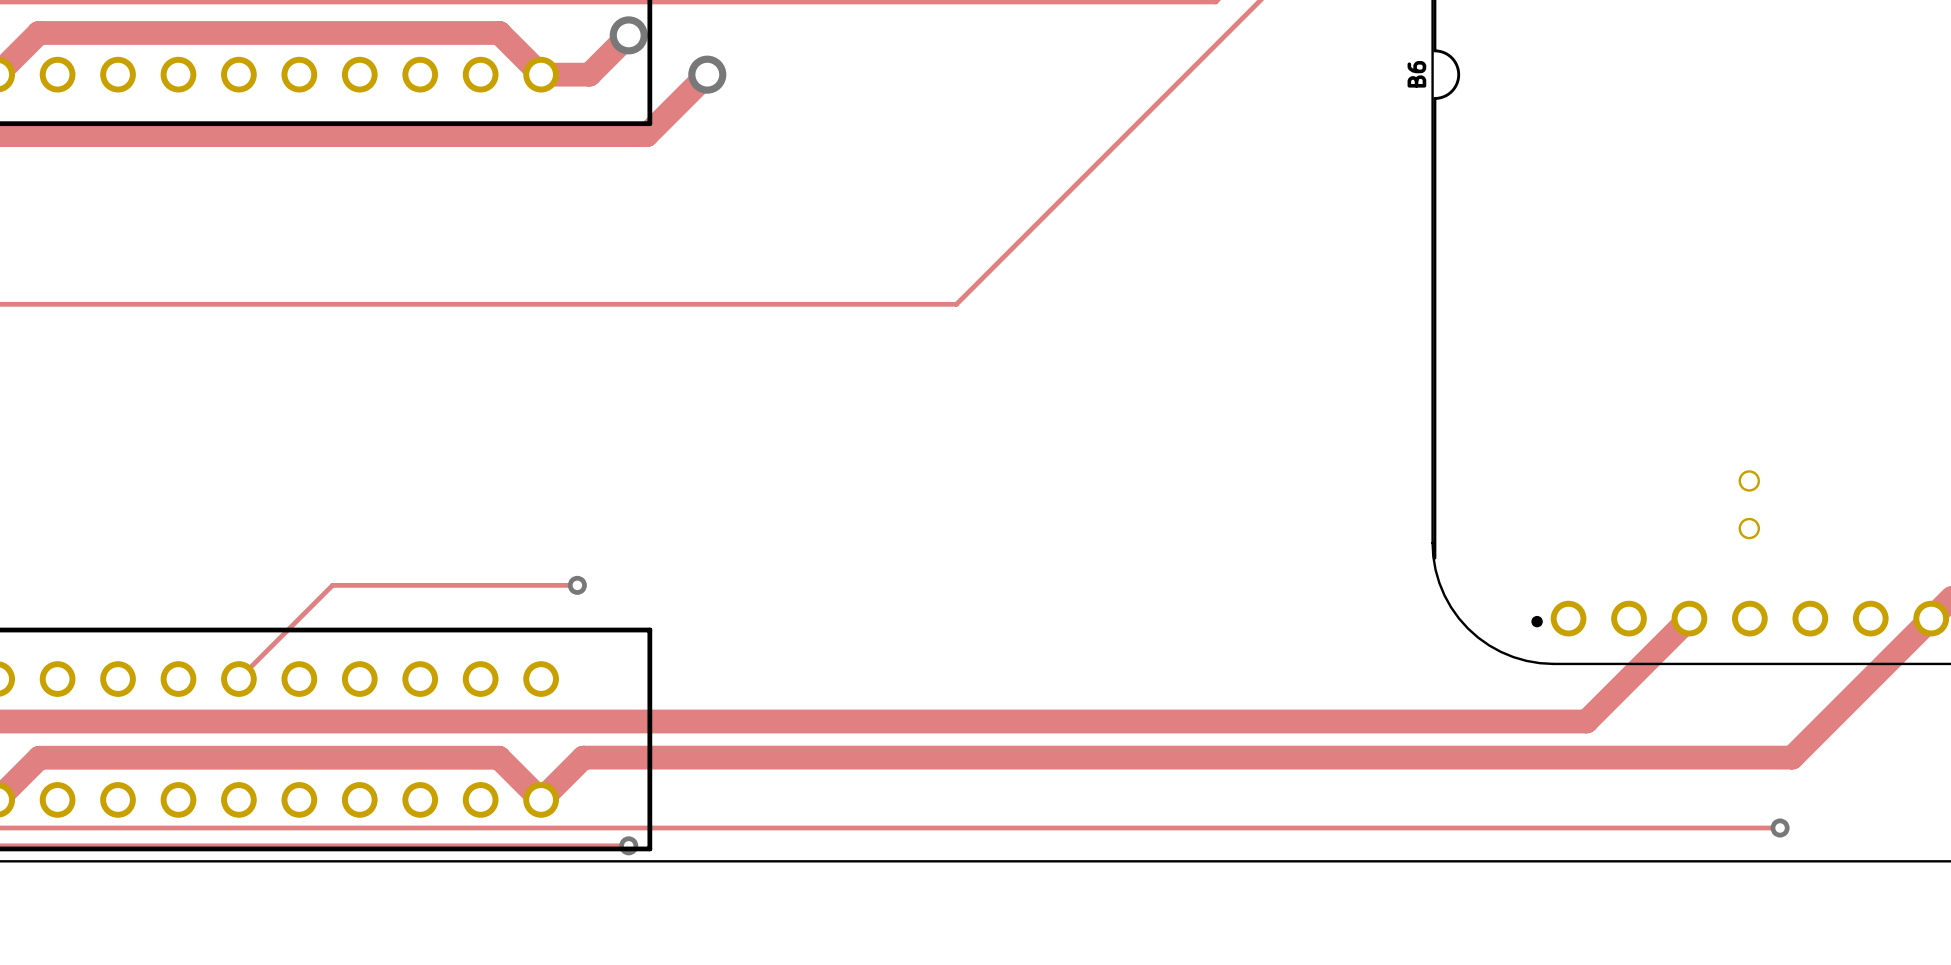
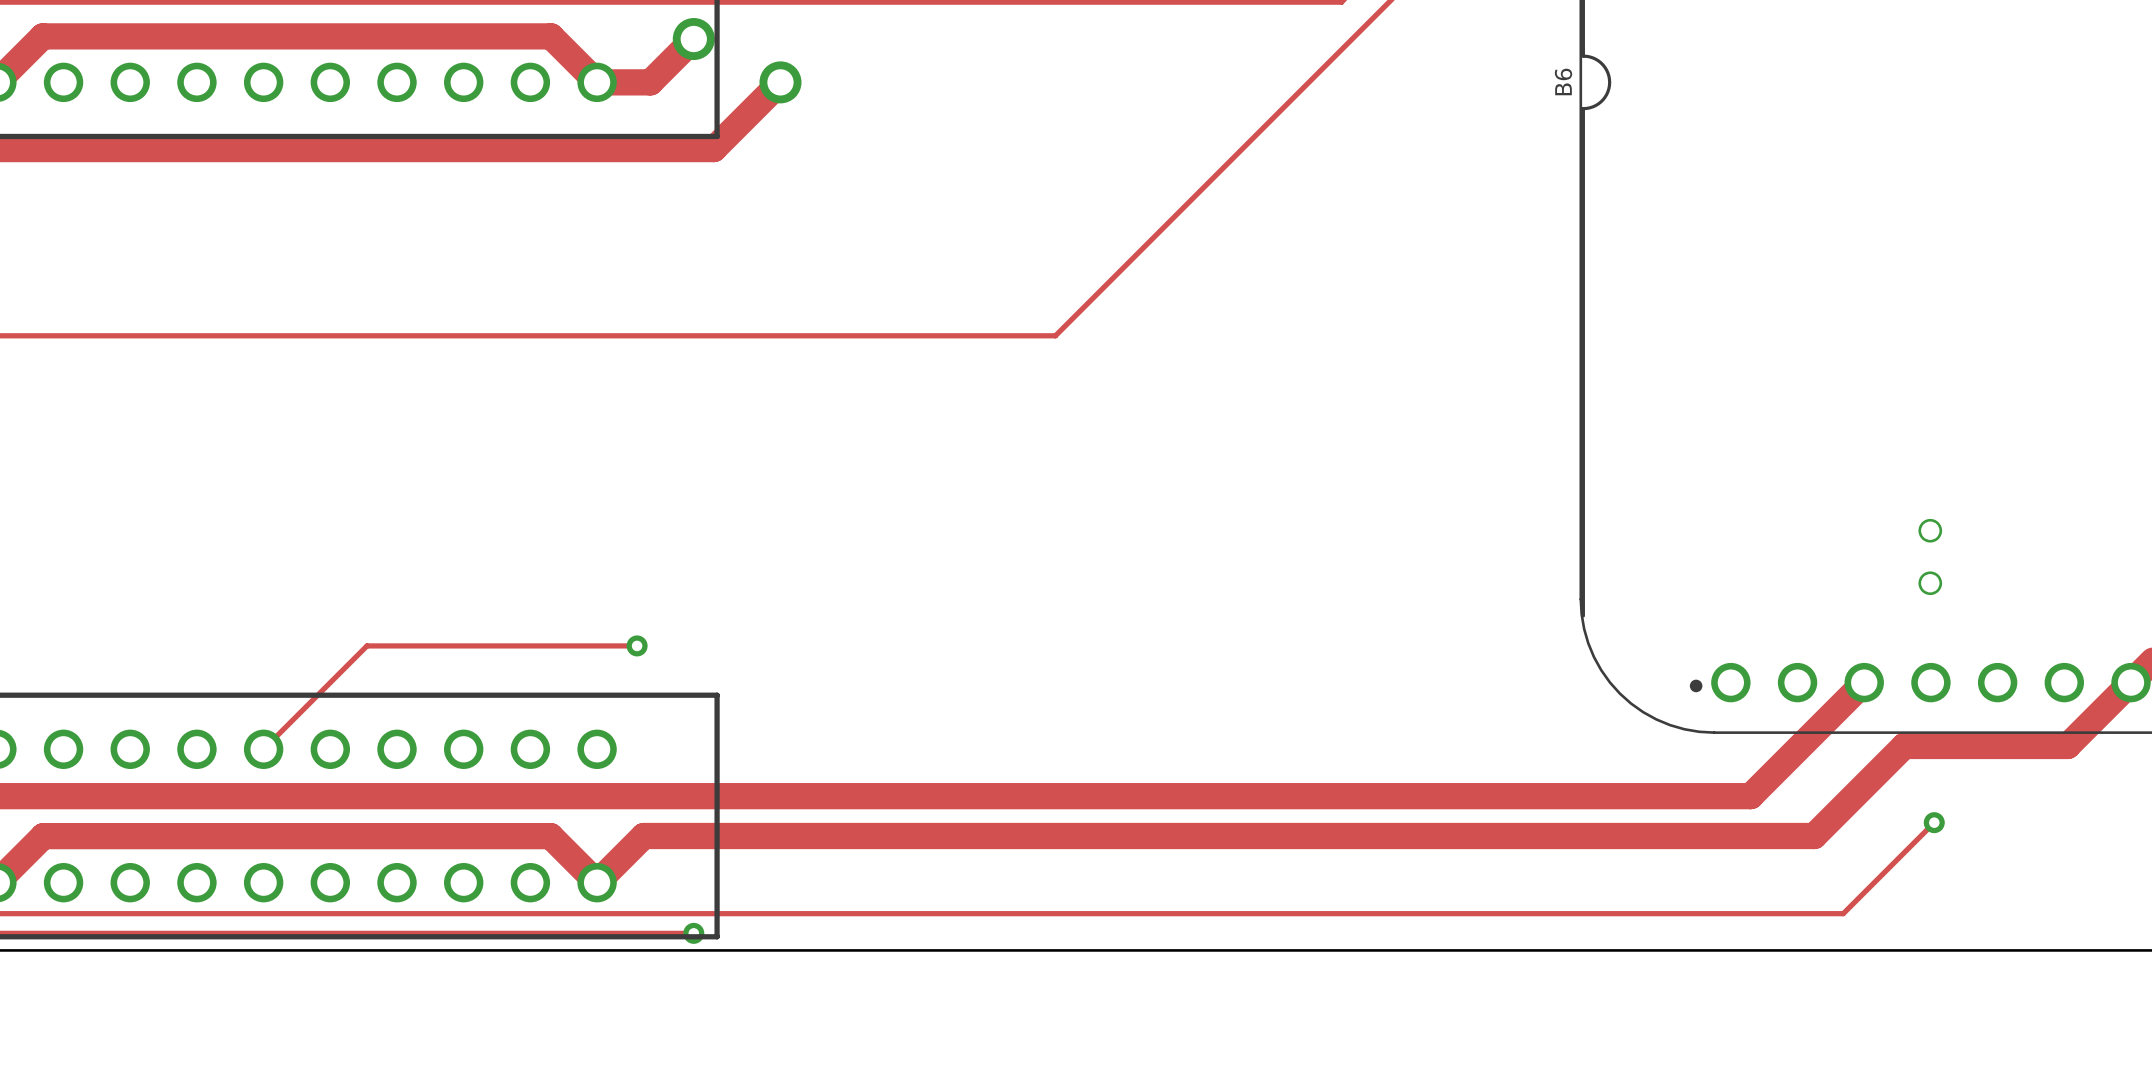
track: (1873, 676) (1792, 757) (1644, 757) -> (2067, 745) (1904, 745) (1814, 836)
track: (1670, 828) (1780, 828) -> (1843, 913) (1934, 822)
via position: (1780, 828) -> (1934, 822)

